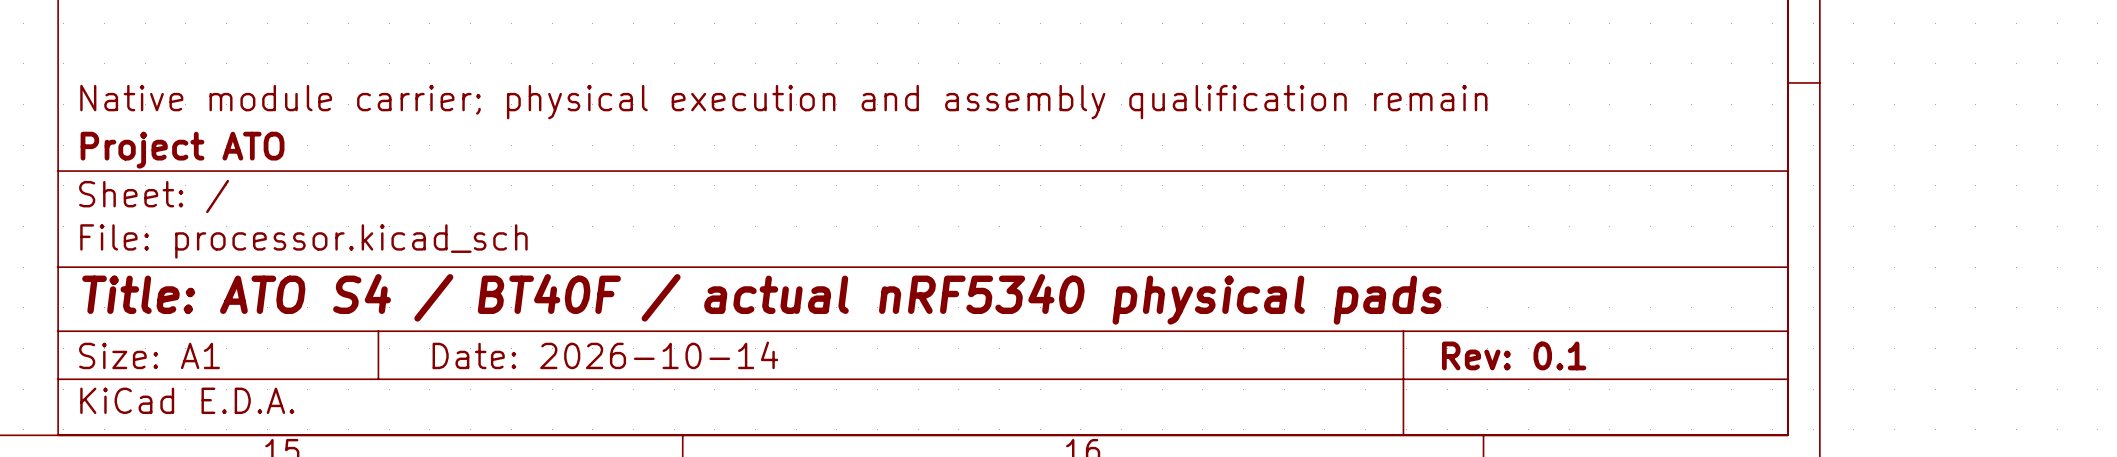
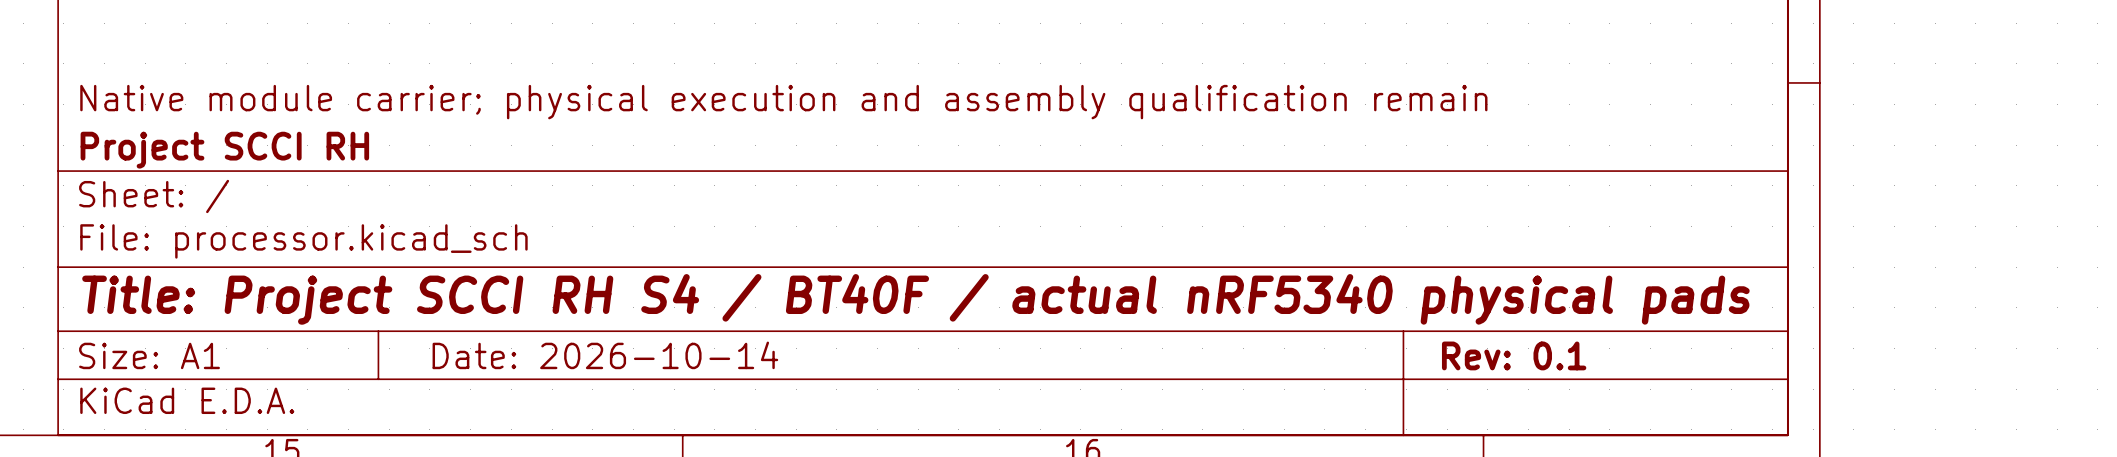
title block: Project ATO (182, 150) -> Project SCCI RH (224, 150)
title block: Title: ATO S4 / BT40F / actual nRF5340 physical pads (761, 299) -> Title: Project SCCI RH S4 / BT40F / actual nRF5340 physical pads (915, 299)

